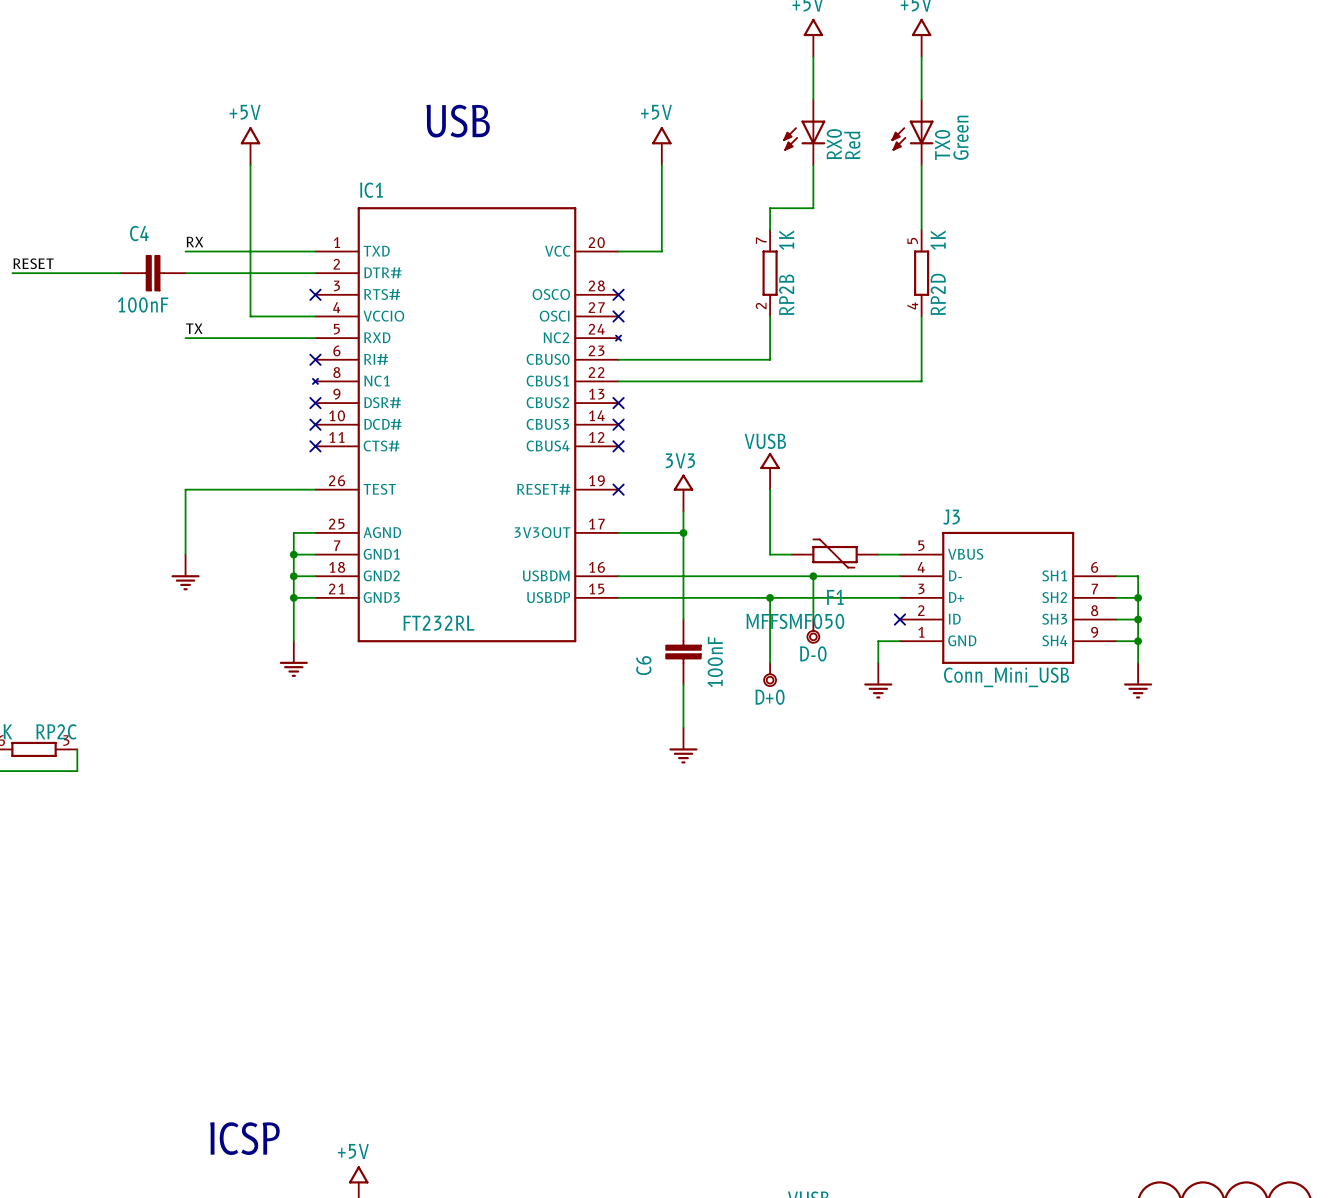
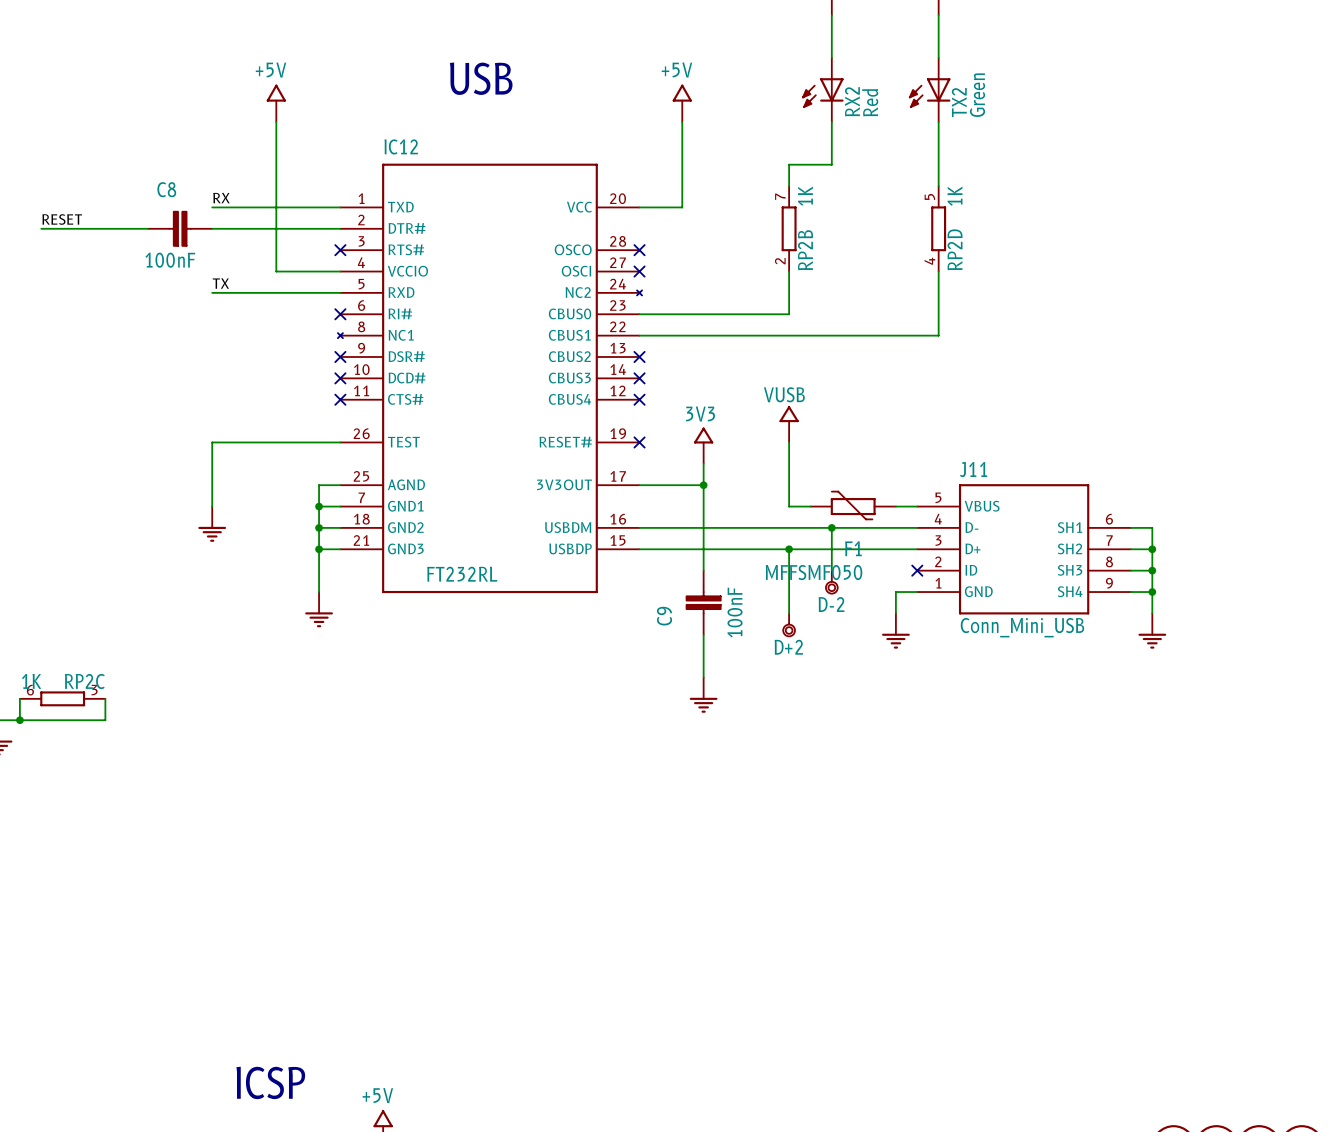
RX0 name: RX0 (834, 144) -> RX2 (852, 101)
TX0 name: TX0 (942, 144) -> TX2 (959, 102)
IC1 name: IC1 (371, 190) -> IC12 (401, 146)
C4 name: C4 (139, 233) -> C8 (166, 189)
J3 name: J3 (951, 517) -> J11 (973, 469)
D-0 name: D-0 (813, 653) -> D-2 (831, 604)
C6 name: C6 (643, 665) -> C9 (664, 616)
D+0 name: D+0 (769, 697) -> D+2 (788, 647)

